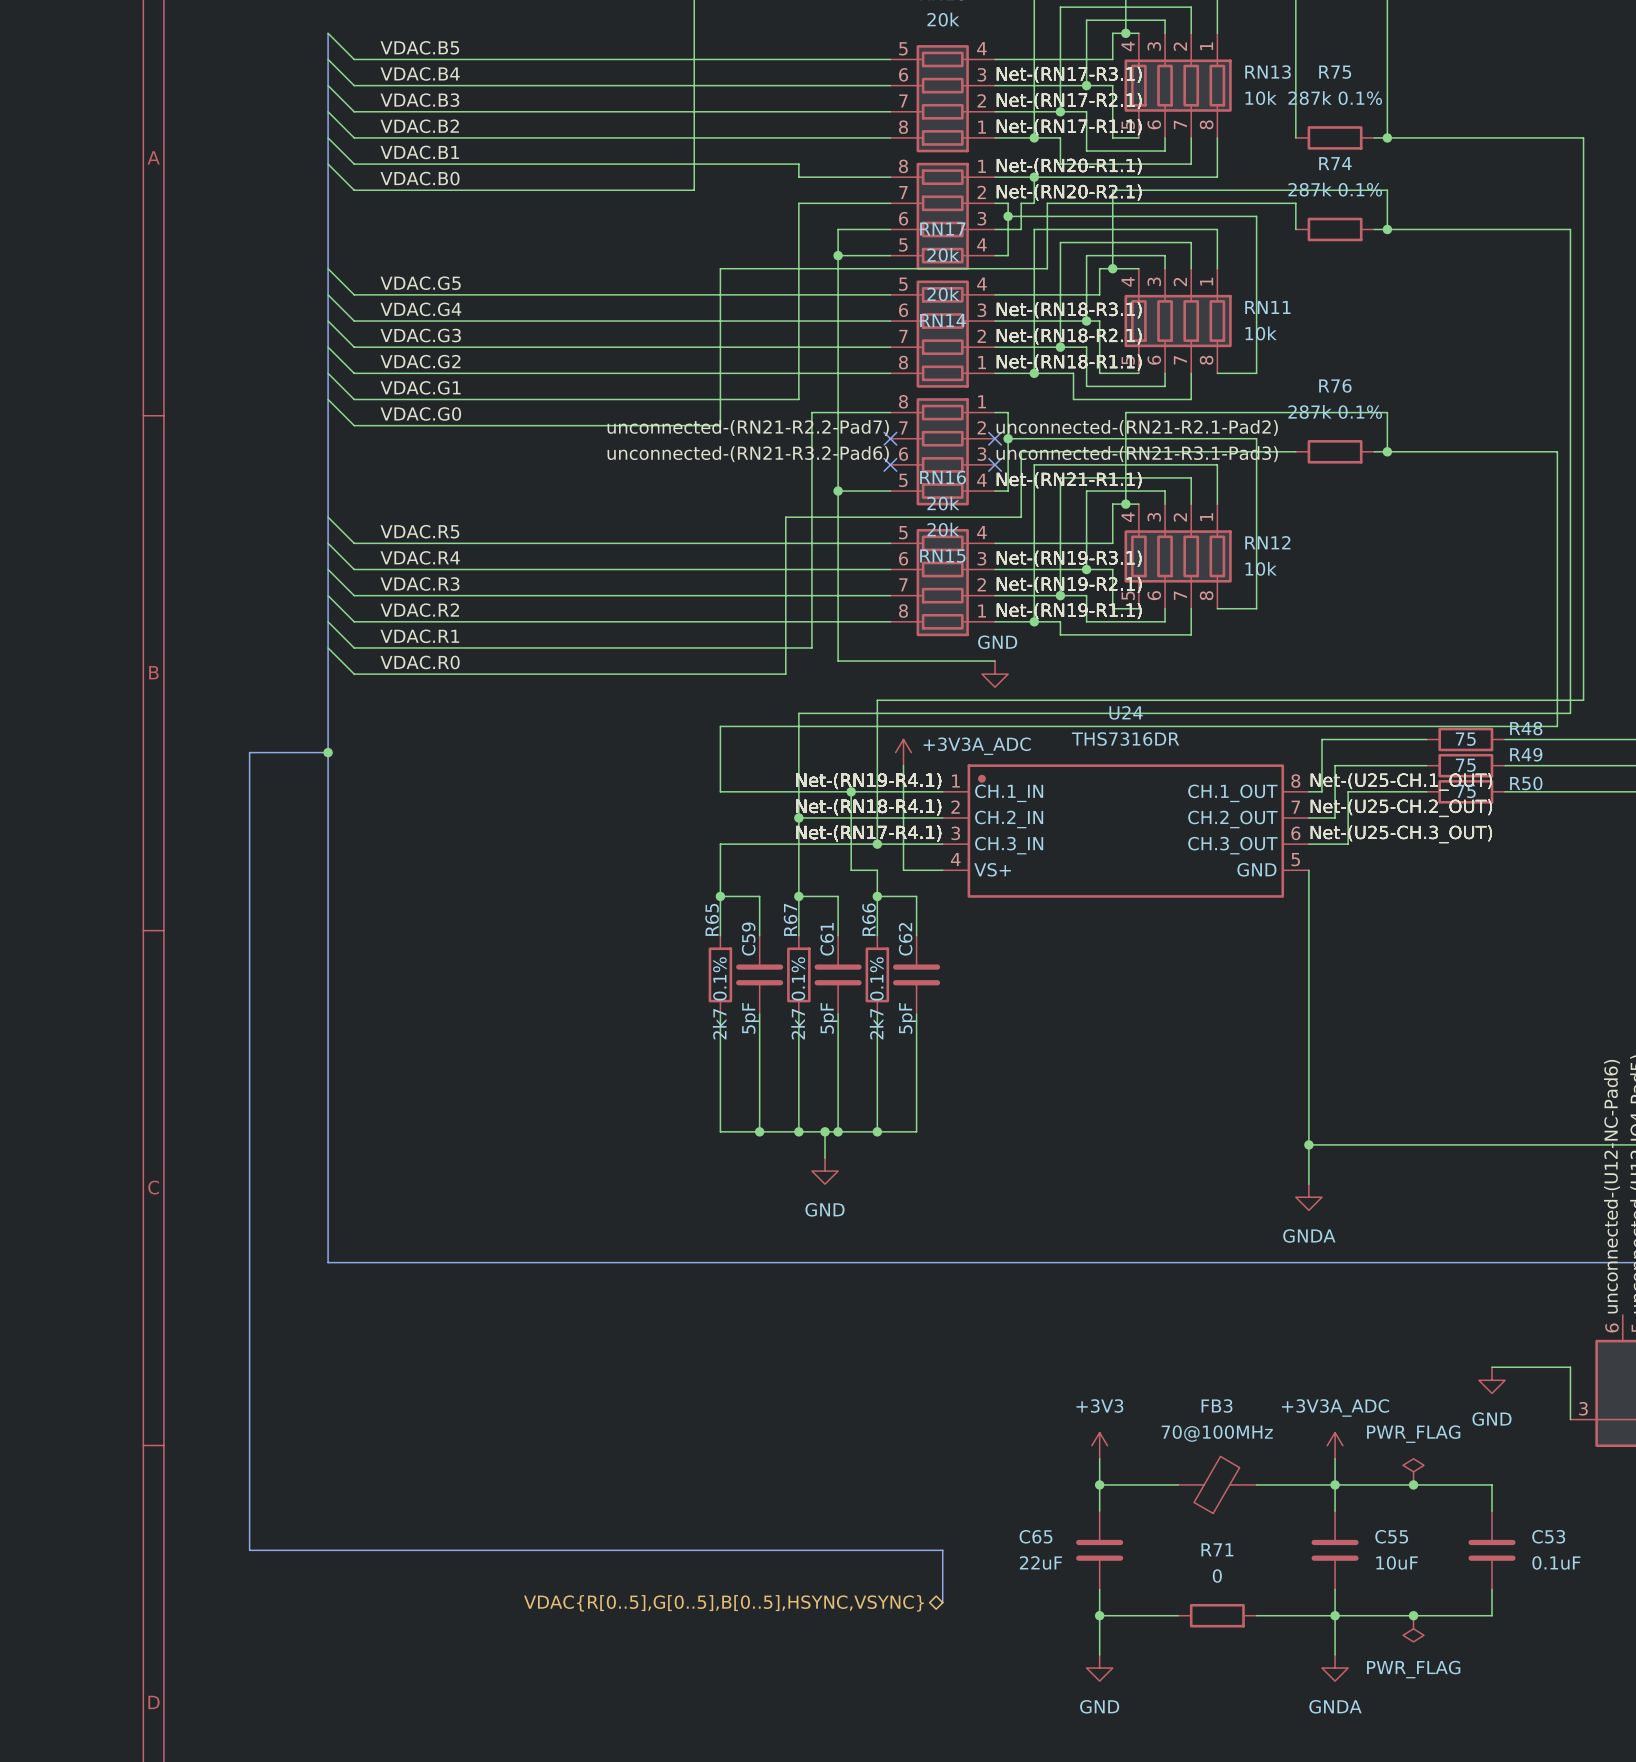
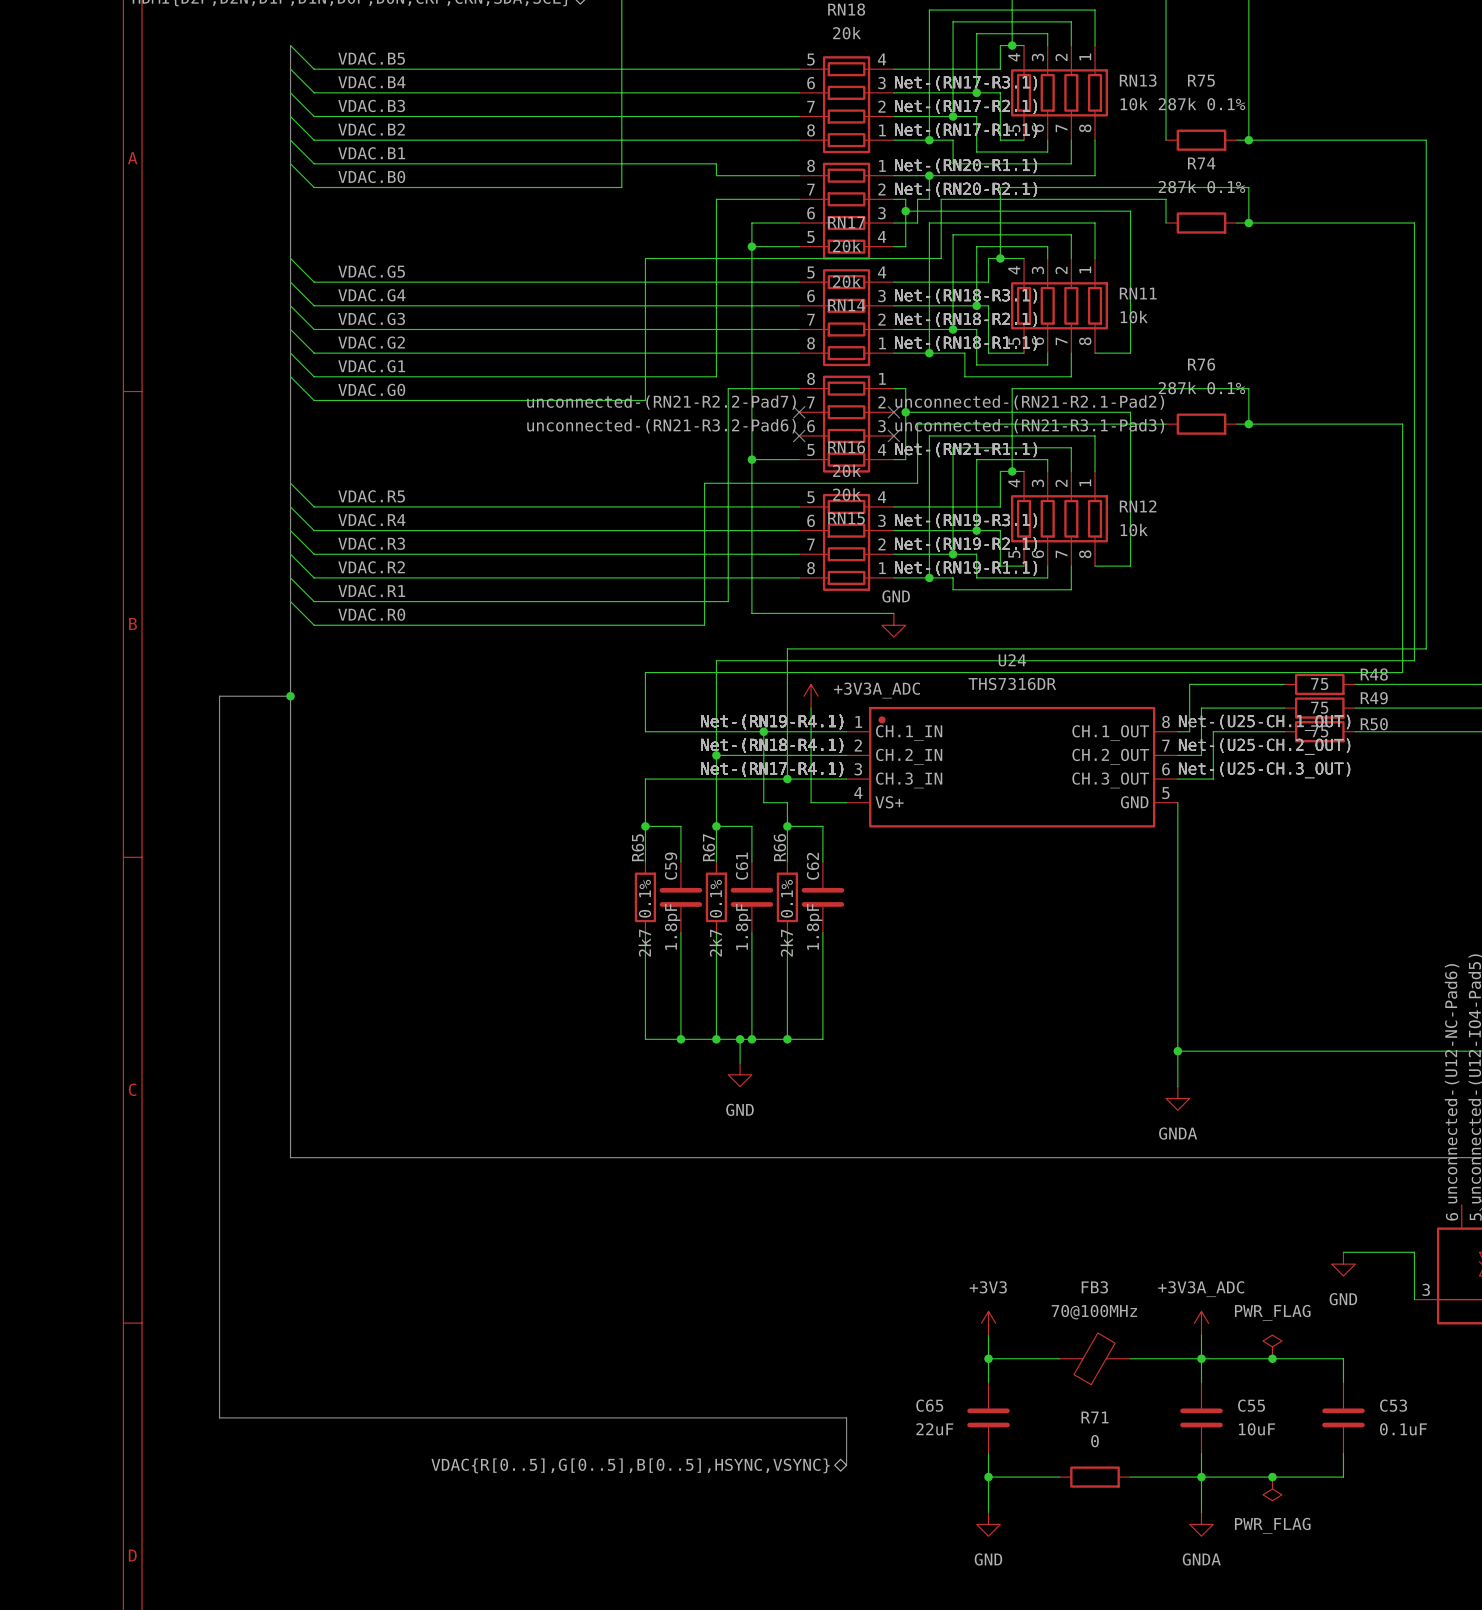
C59 value: 5pF (750, 1018) -> 1.8pF (672, 926)
C61 value: 5pF (829, 1018) -> 1.8pF (743, 926)
C62 value: 5pF (907, 1018) -> 1.8pF (814, 926)

